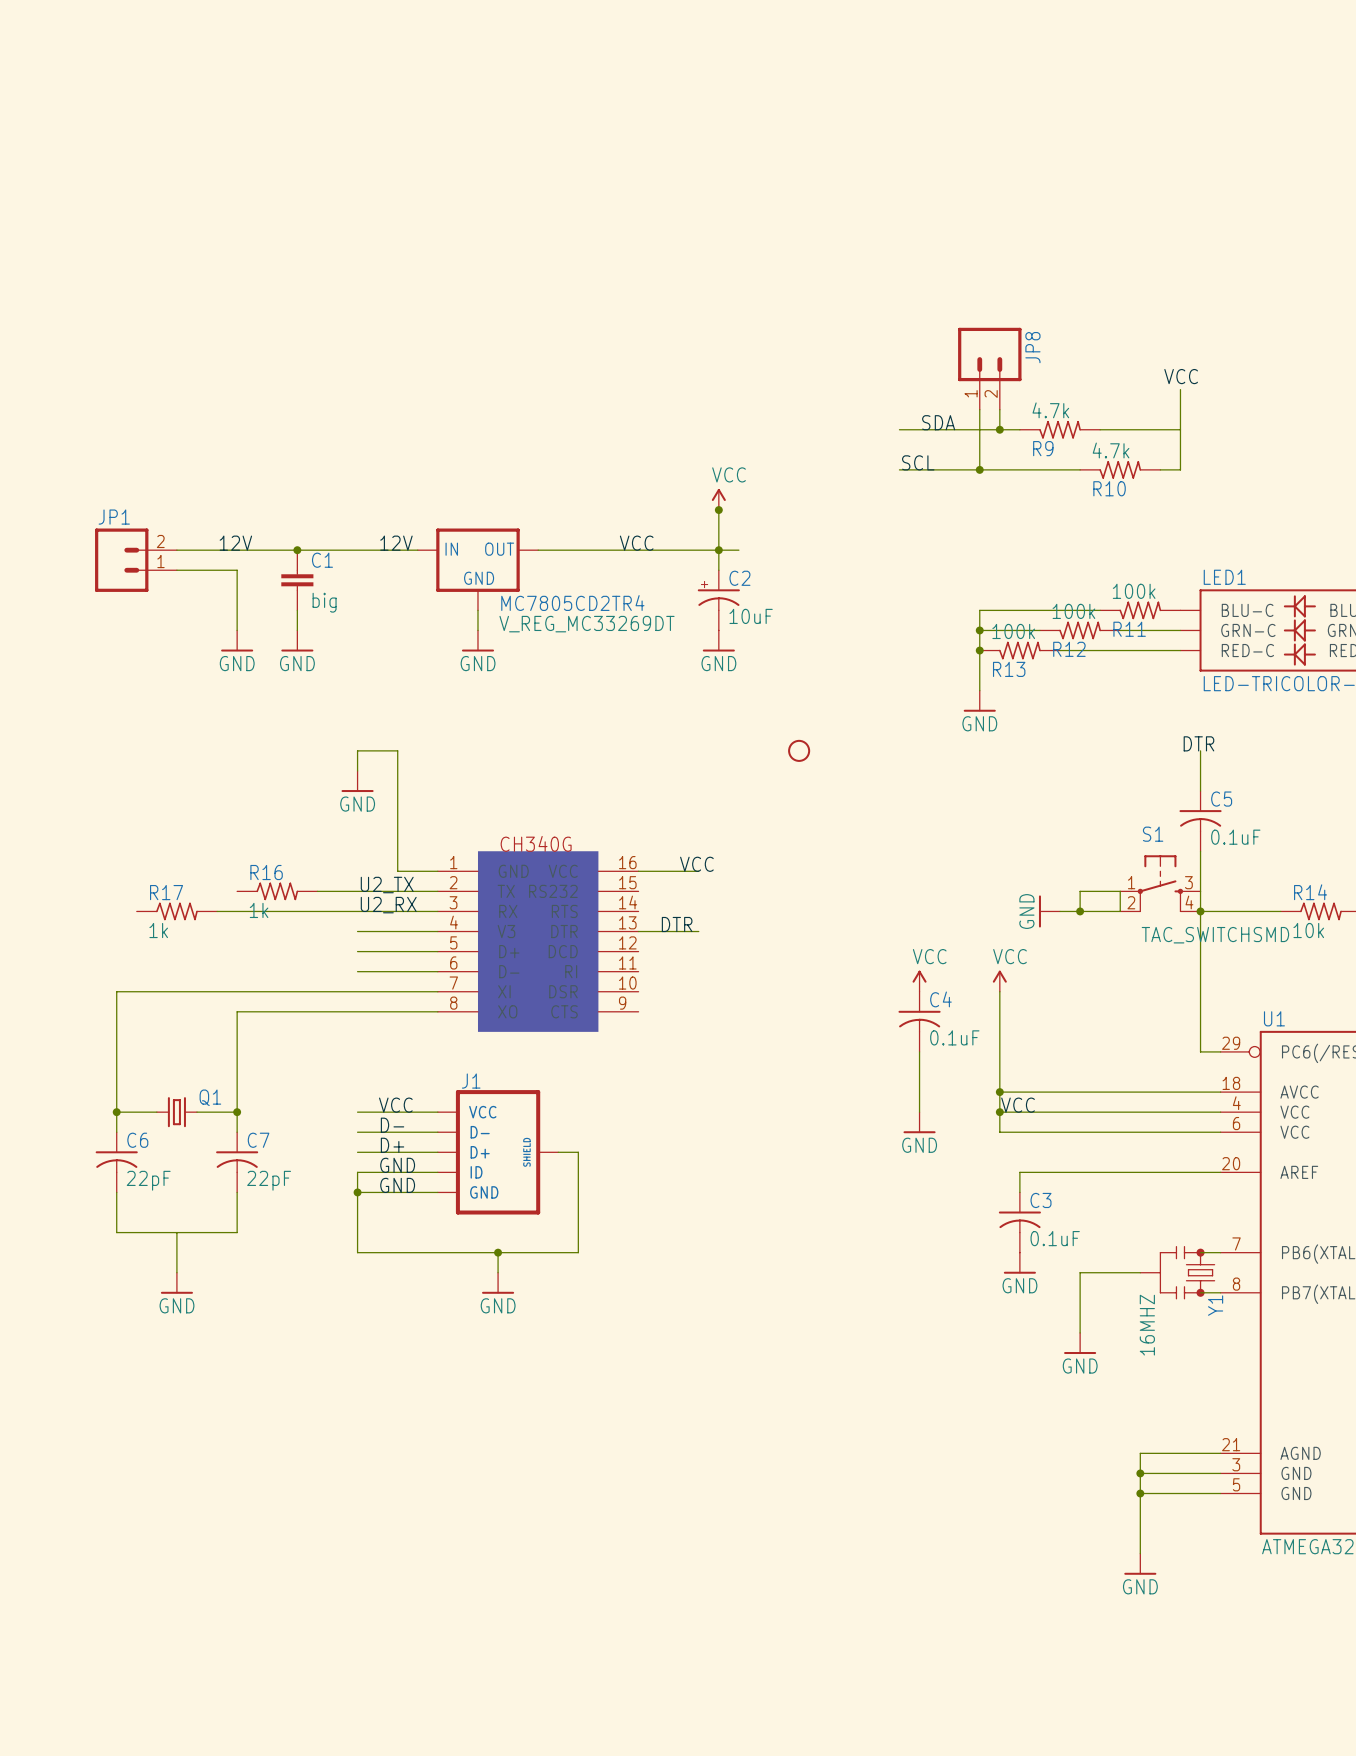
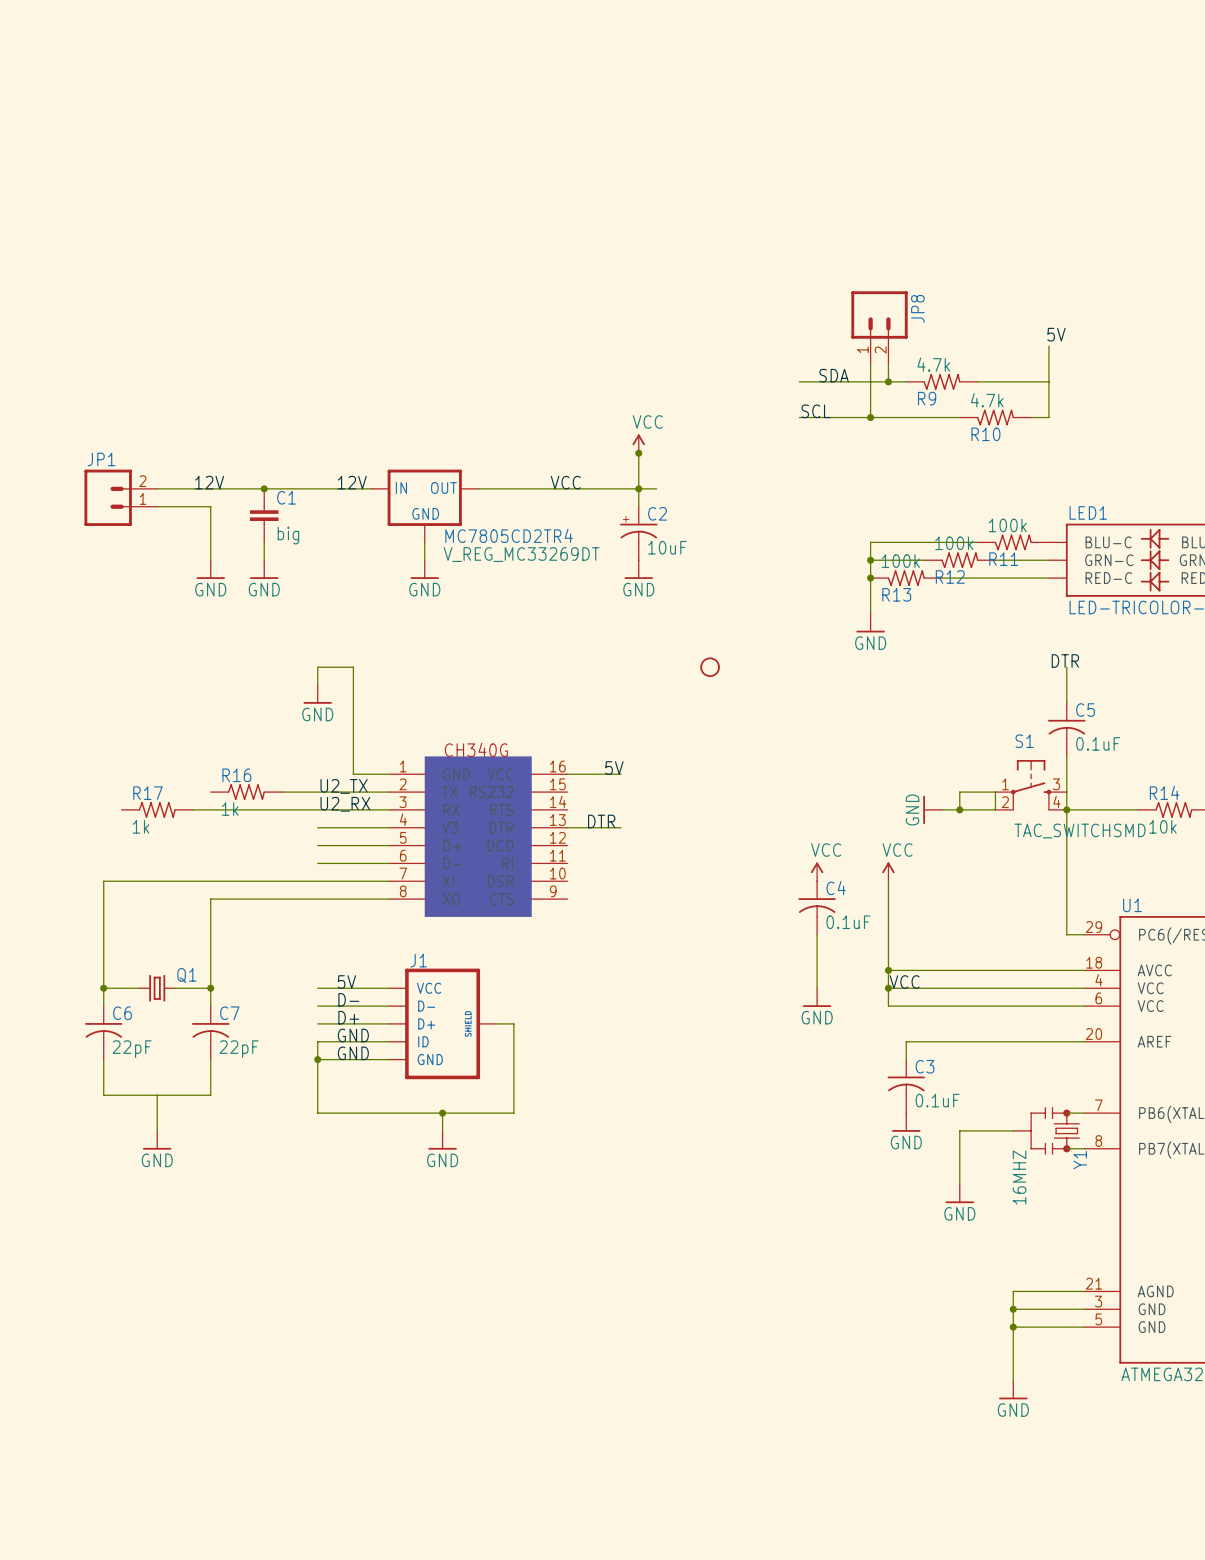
label: VCC (1181, 376) -> 5V (1056, 334)
label: VCC (696, 864) -> 5V (614, 768)
label: VCC (395, 1105) -> 5V (346, 982)

